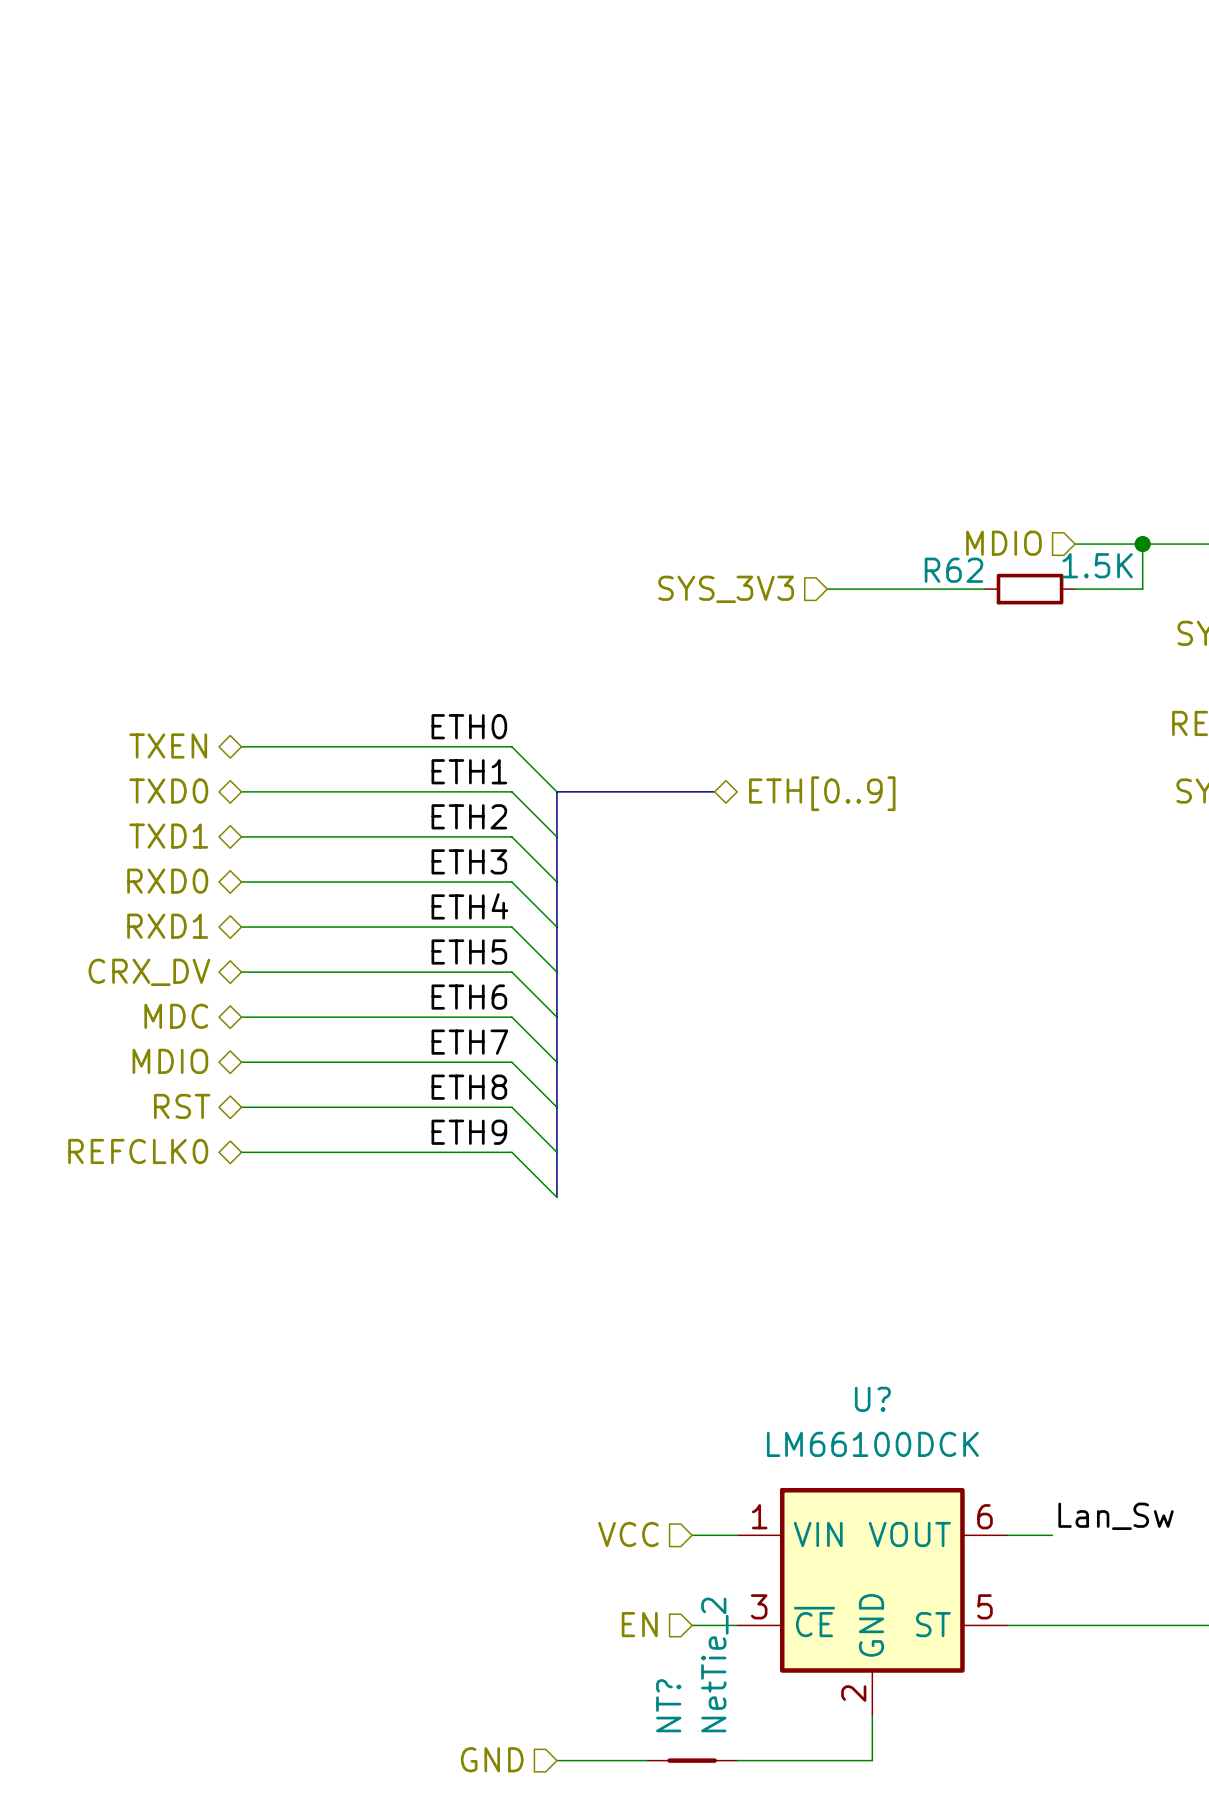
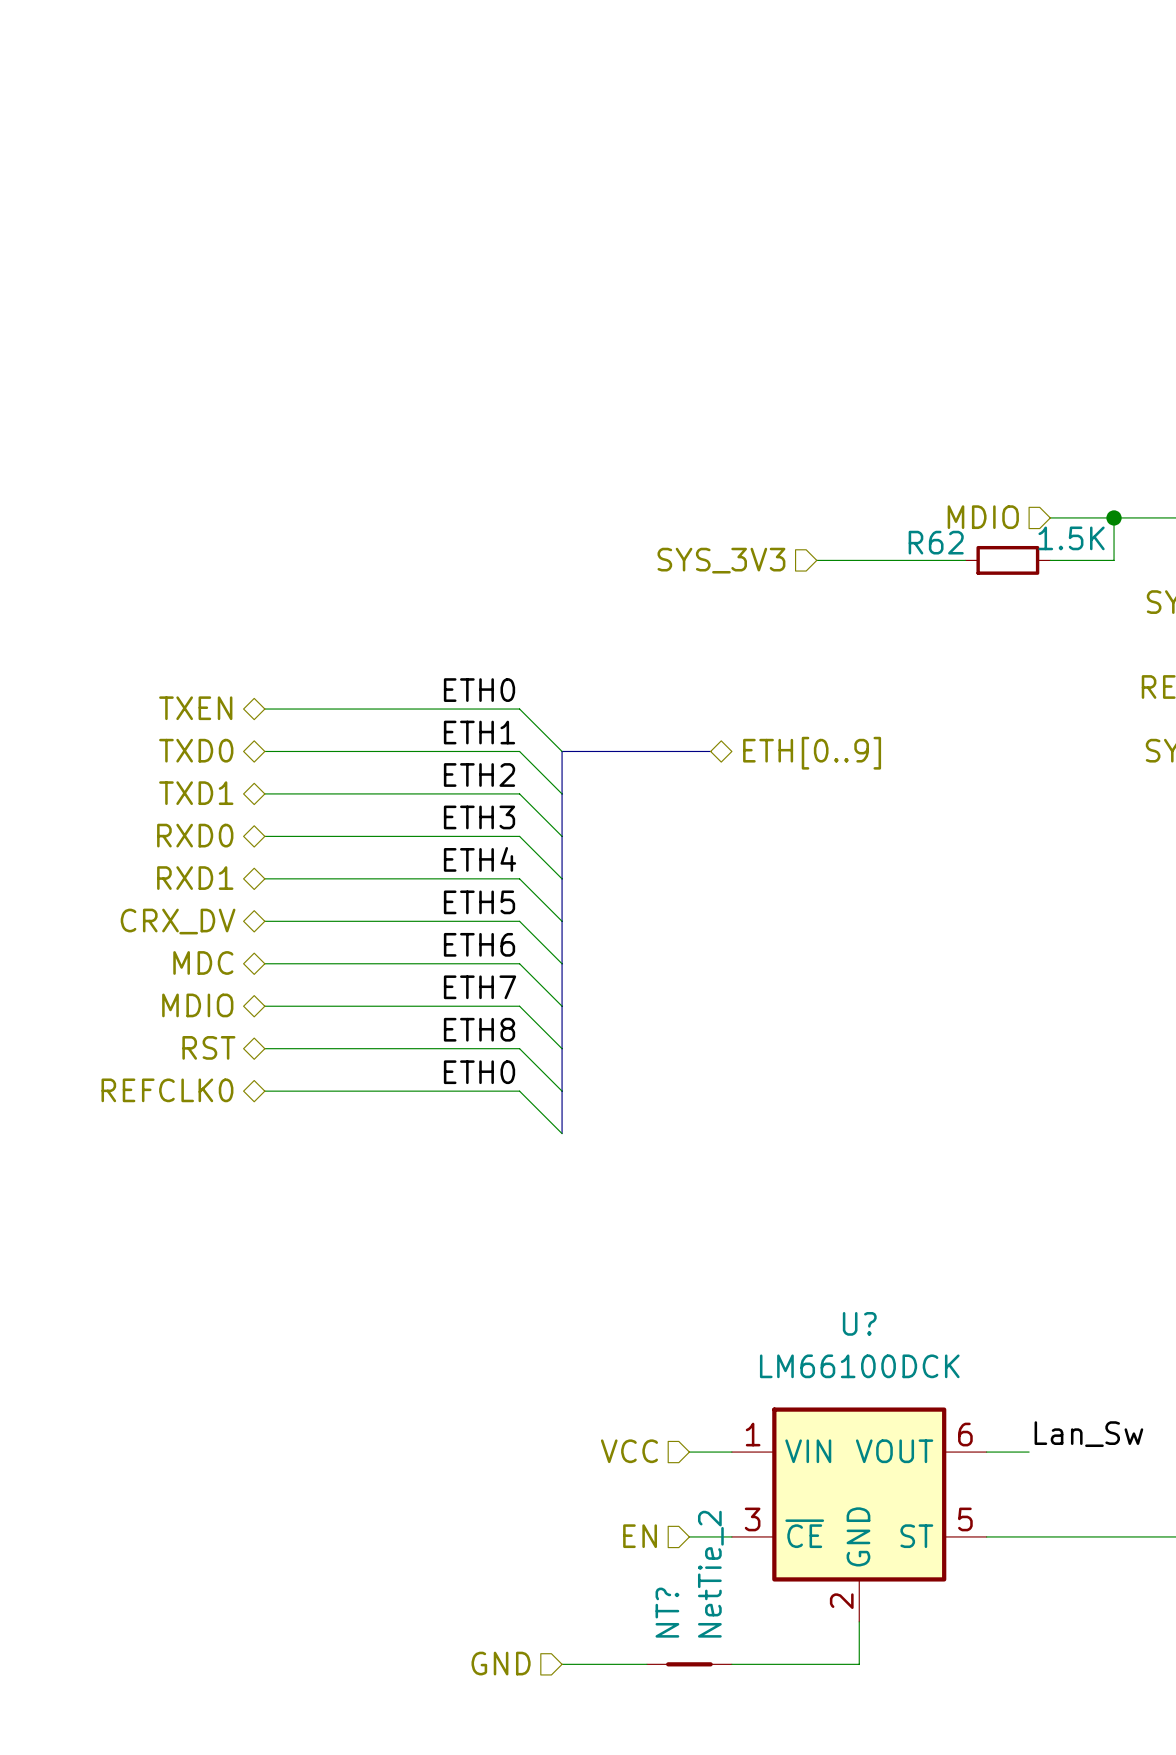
label: ETH9 (469, 1132) -> ETH0 (479, 1072)

